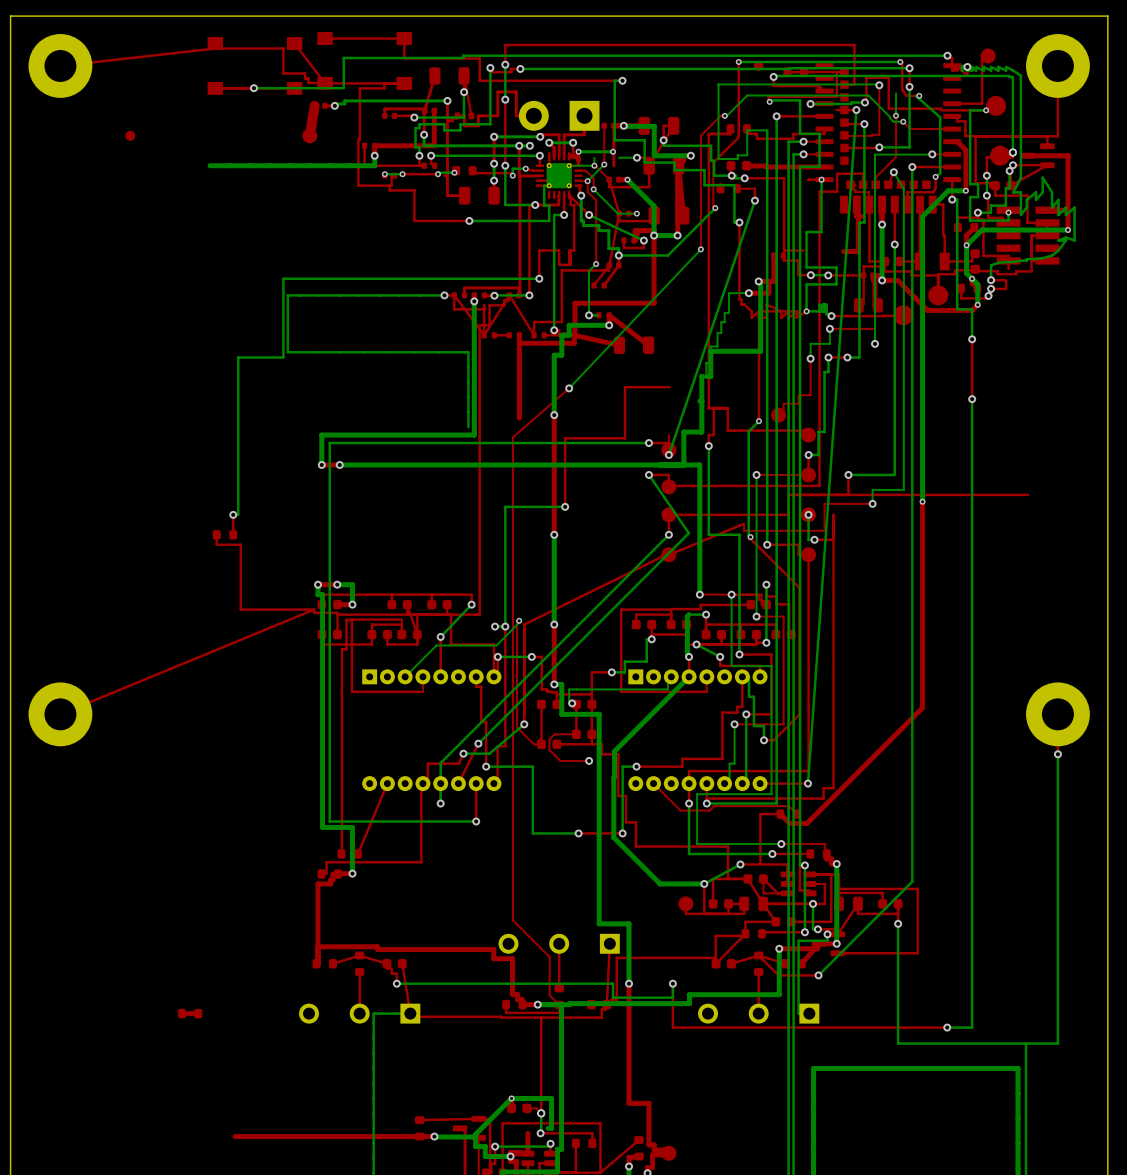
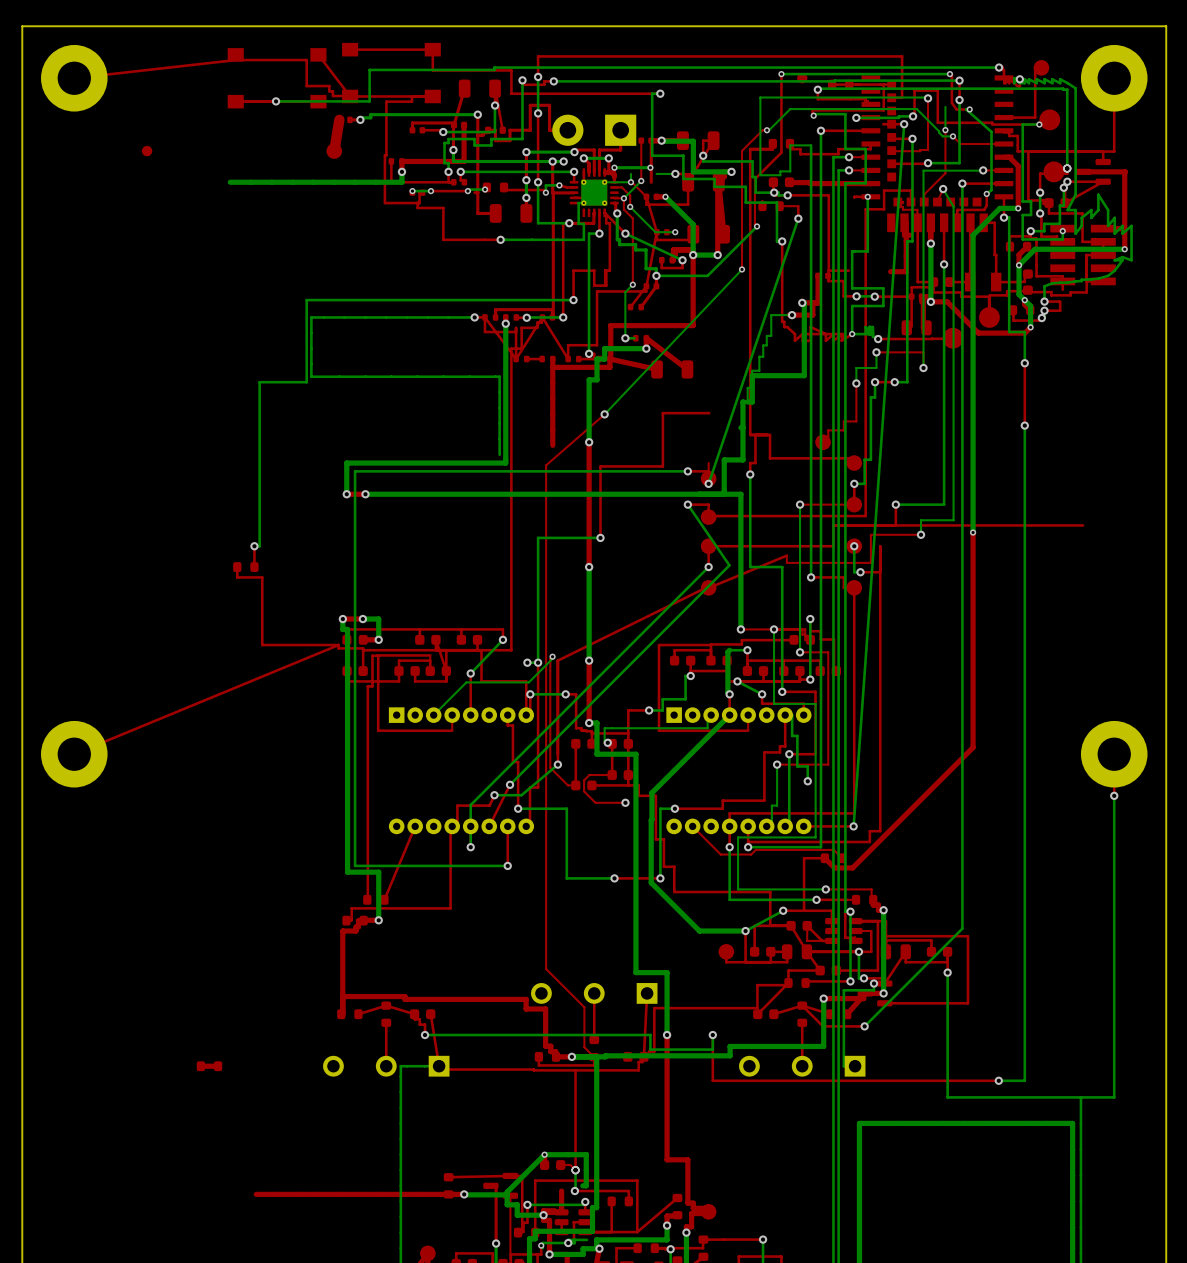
top track: (758, 317) (758, 421) -> none
bottom track: (758, 421) (748, 431) (748, 535) (750, 537) -> none
via: (758, 421) -> none
top track: (750, 537) (799, 587) (799, 714) (773, 740) (763, 740) -> none
via: (750, 537) -> none

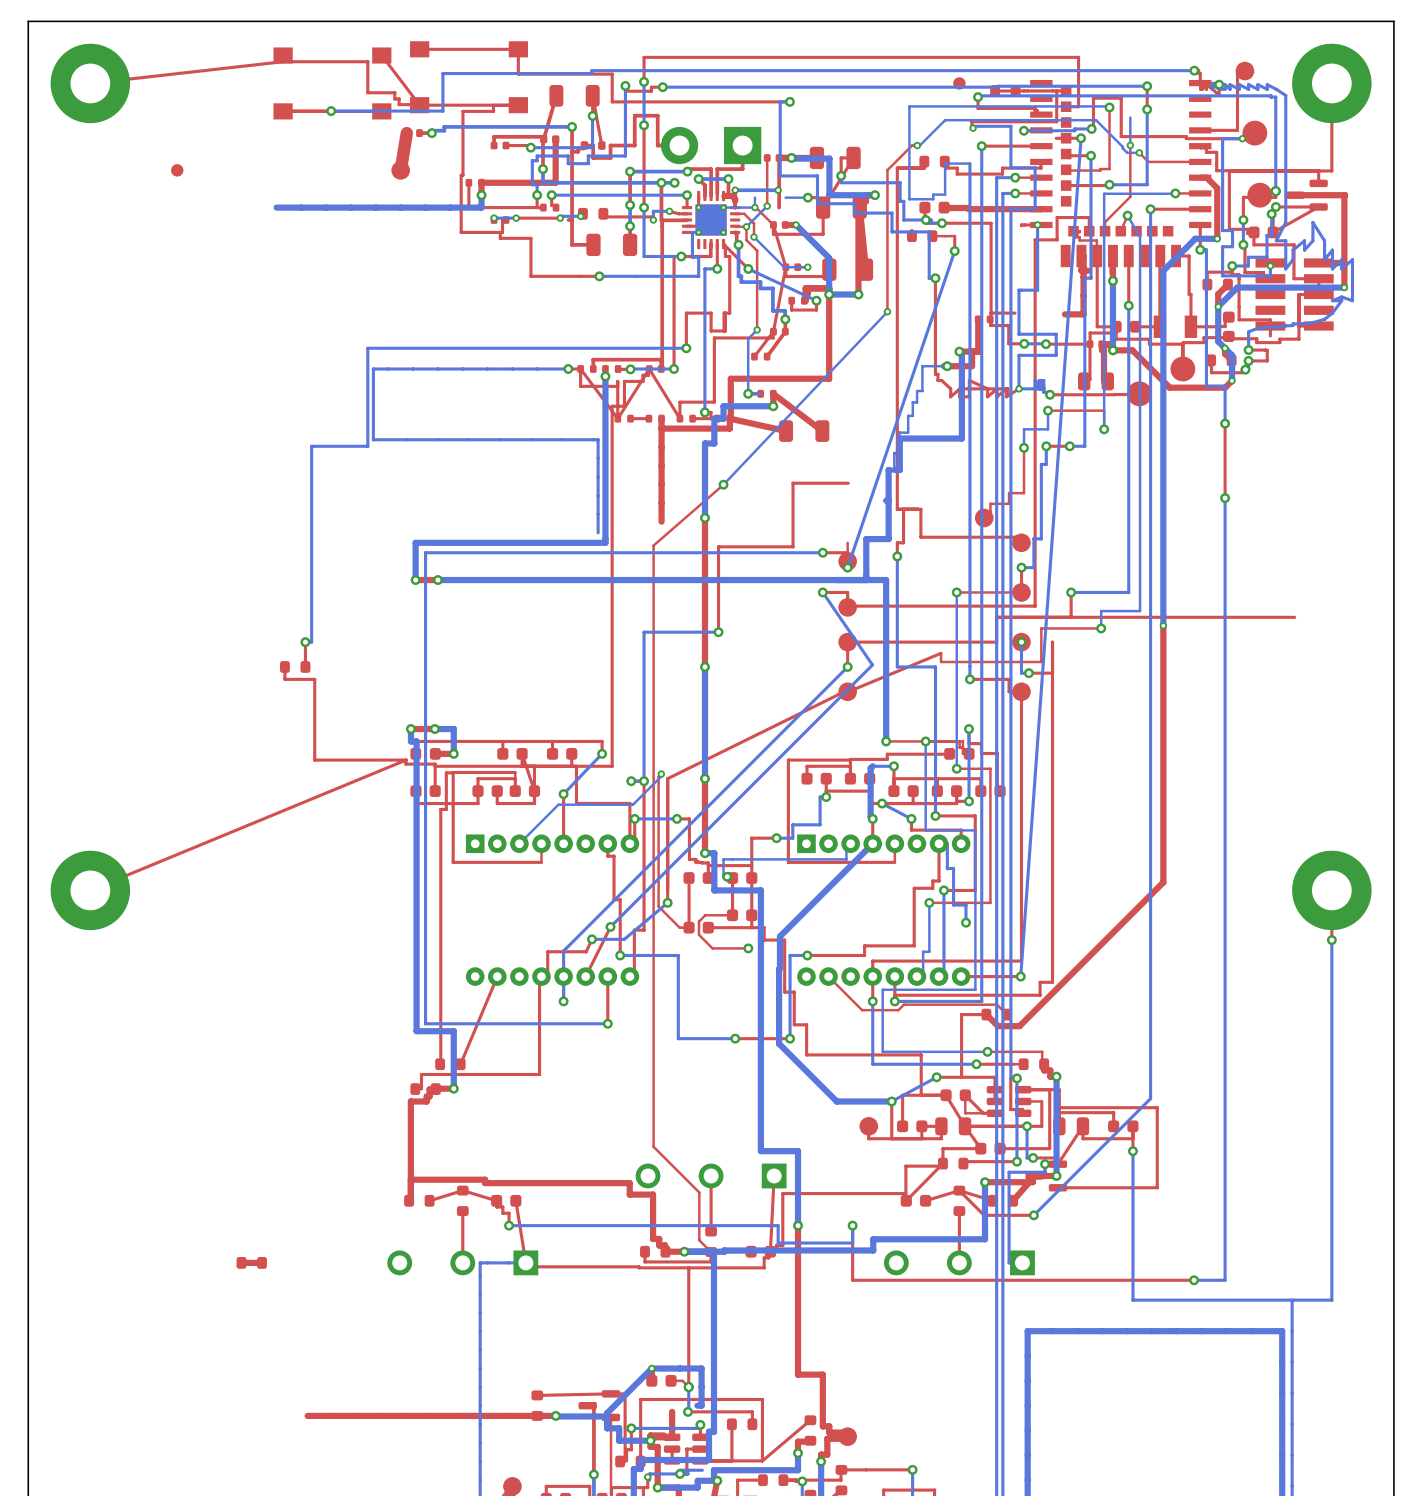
top track: (781, 74) (781, 152) (754, 179) (754, 224) (757, 226) -> none
via: (781, 74) -> none
bottom track: (949, 74) (781, 74) -> none
via: (949, 74) -> none
top track: (951, 74) (951, 102) (956, 109) (969, 109) -> none
bottom track: (969, 109) (966, 109) (991, 131) (991, 190) (986, 193) -> none
via: (969, 109) -> none
top track: (986, 193) (986, 205) (984, 209) (957, 209) (957, 222) -> none
via: (986, 193) -> none
bottom track: (757, 226) (707, 275) (656, 275) -> none
via: (757, 226) -> none

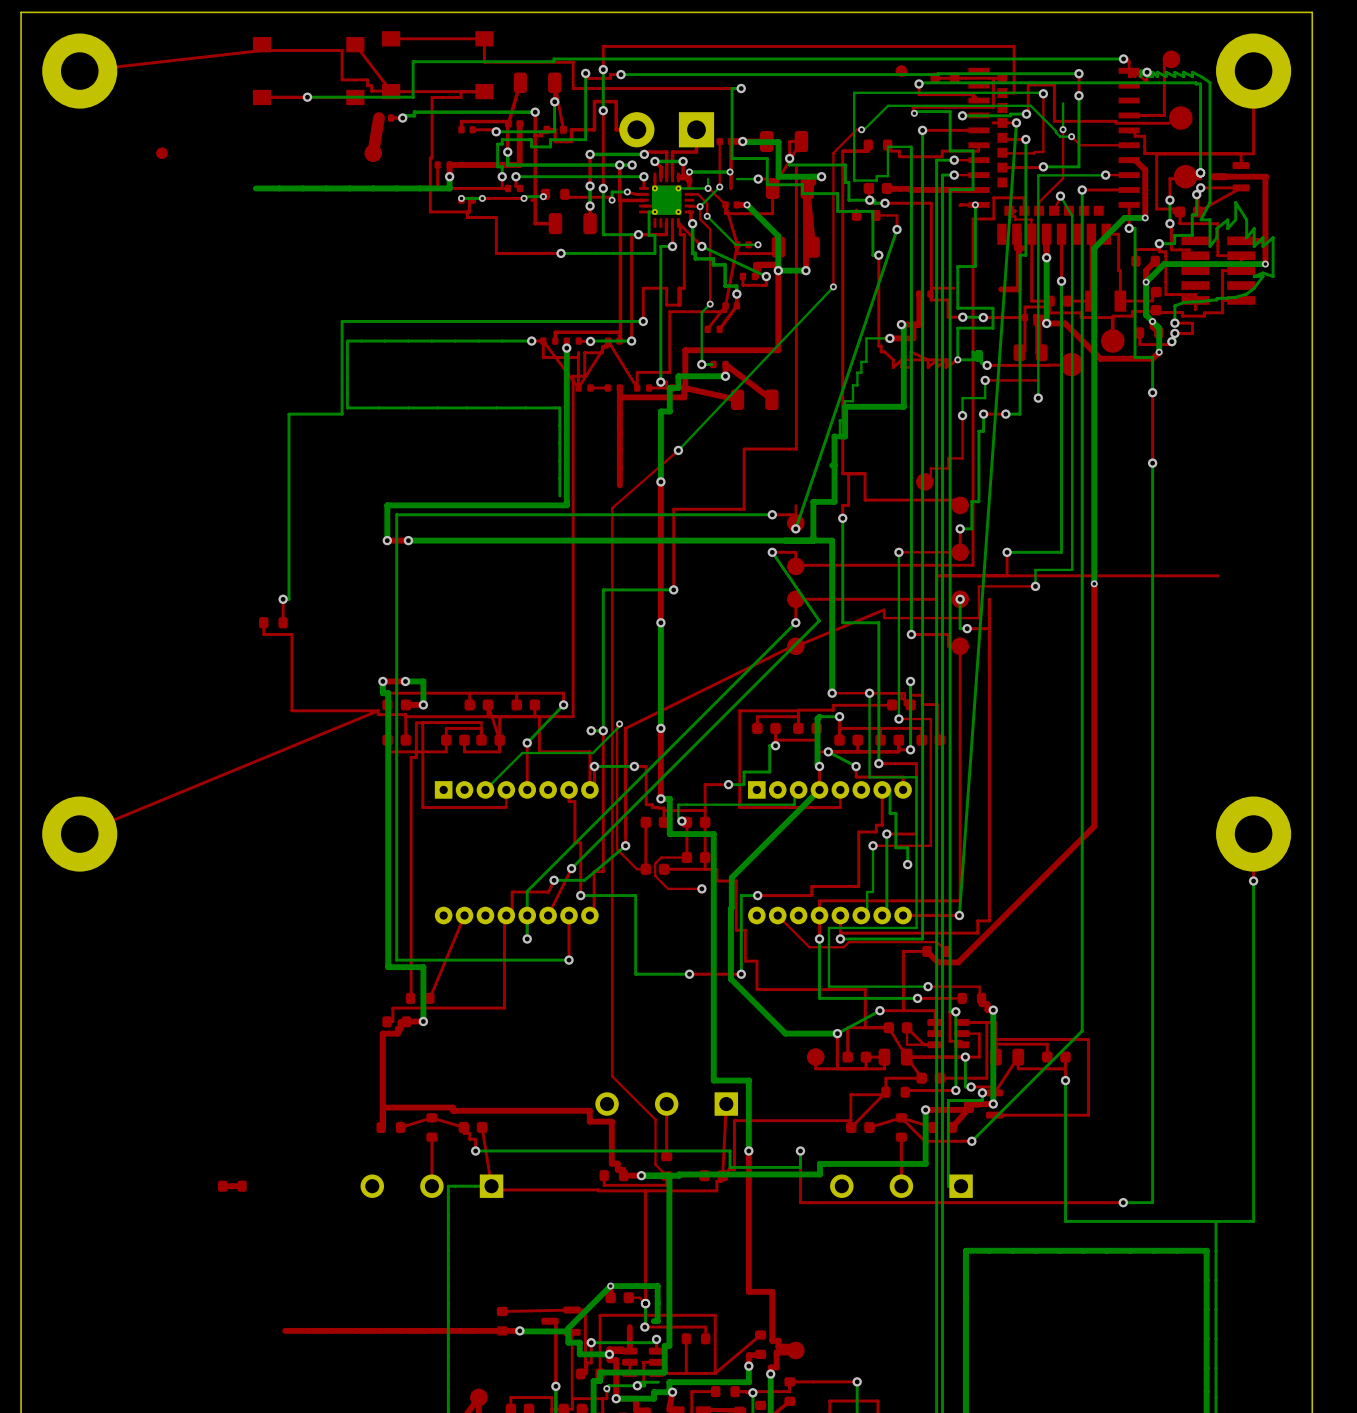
bottom track: (1242, 138) (1222, 138) (1222, 230) (1232, 230) (1232, 246) (1222, 246) (1222, 275) (1270, 275) (1270, 262) -> none
via: (1242, 138) -> none
top track: none -> (796, 167) (796, 449)
via: (1270, 265) -> none

